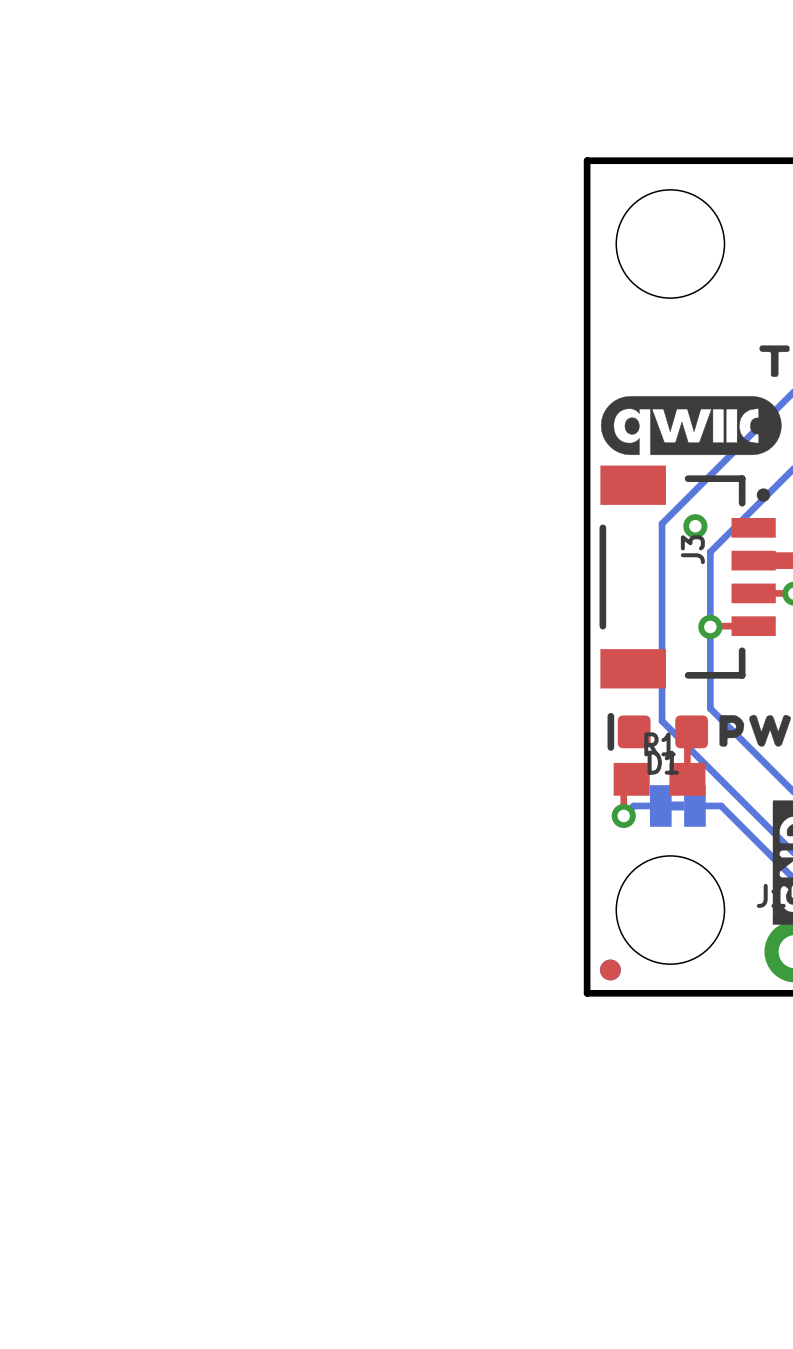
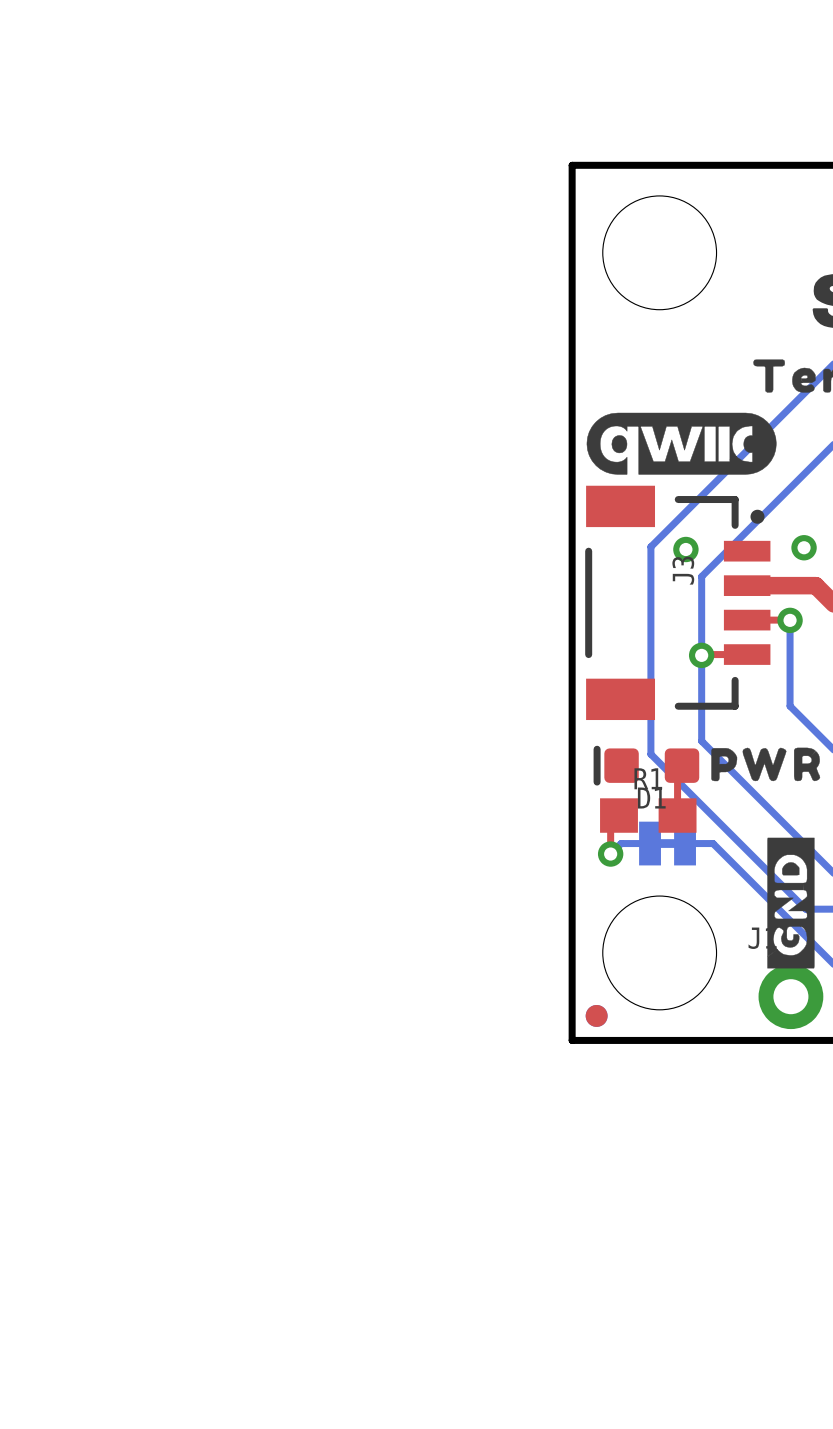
part footprint: [649, 785, 706, 827] -> [639, 821, 696, 866]

